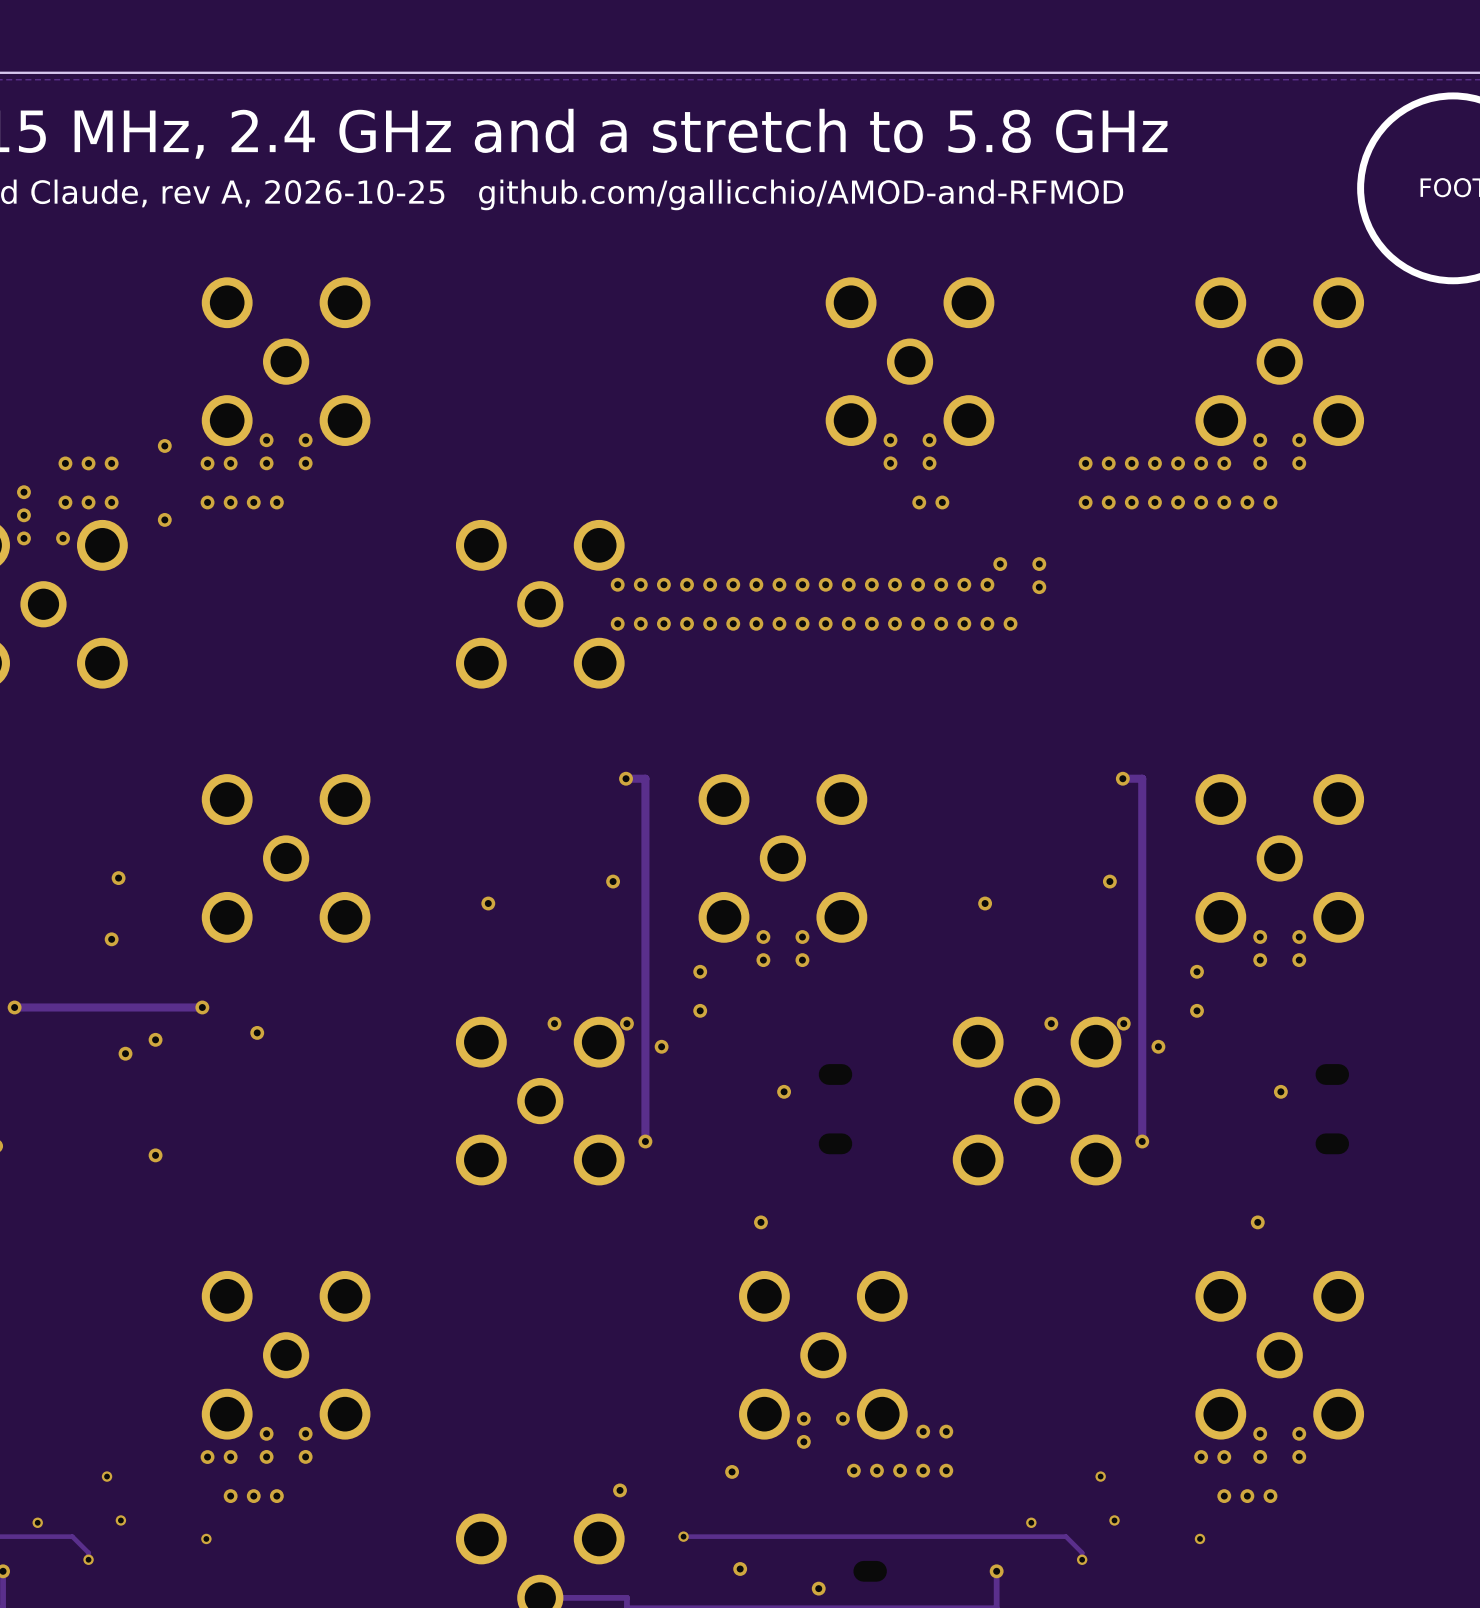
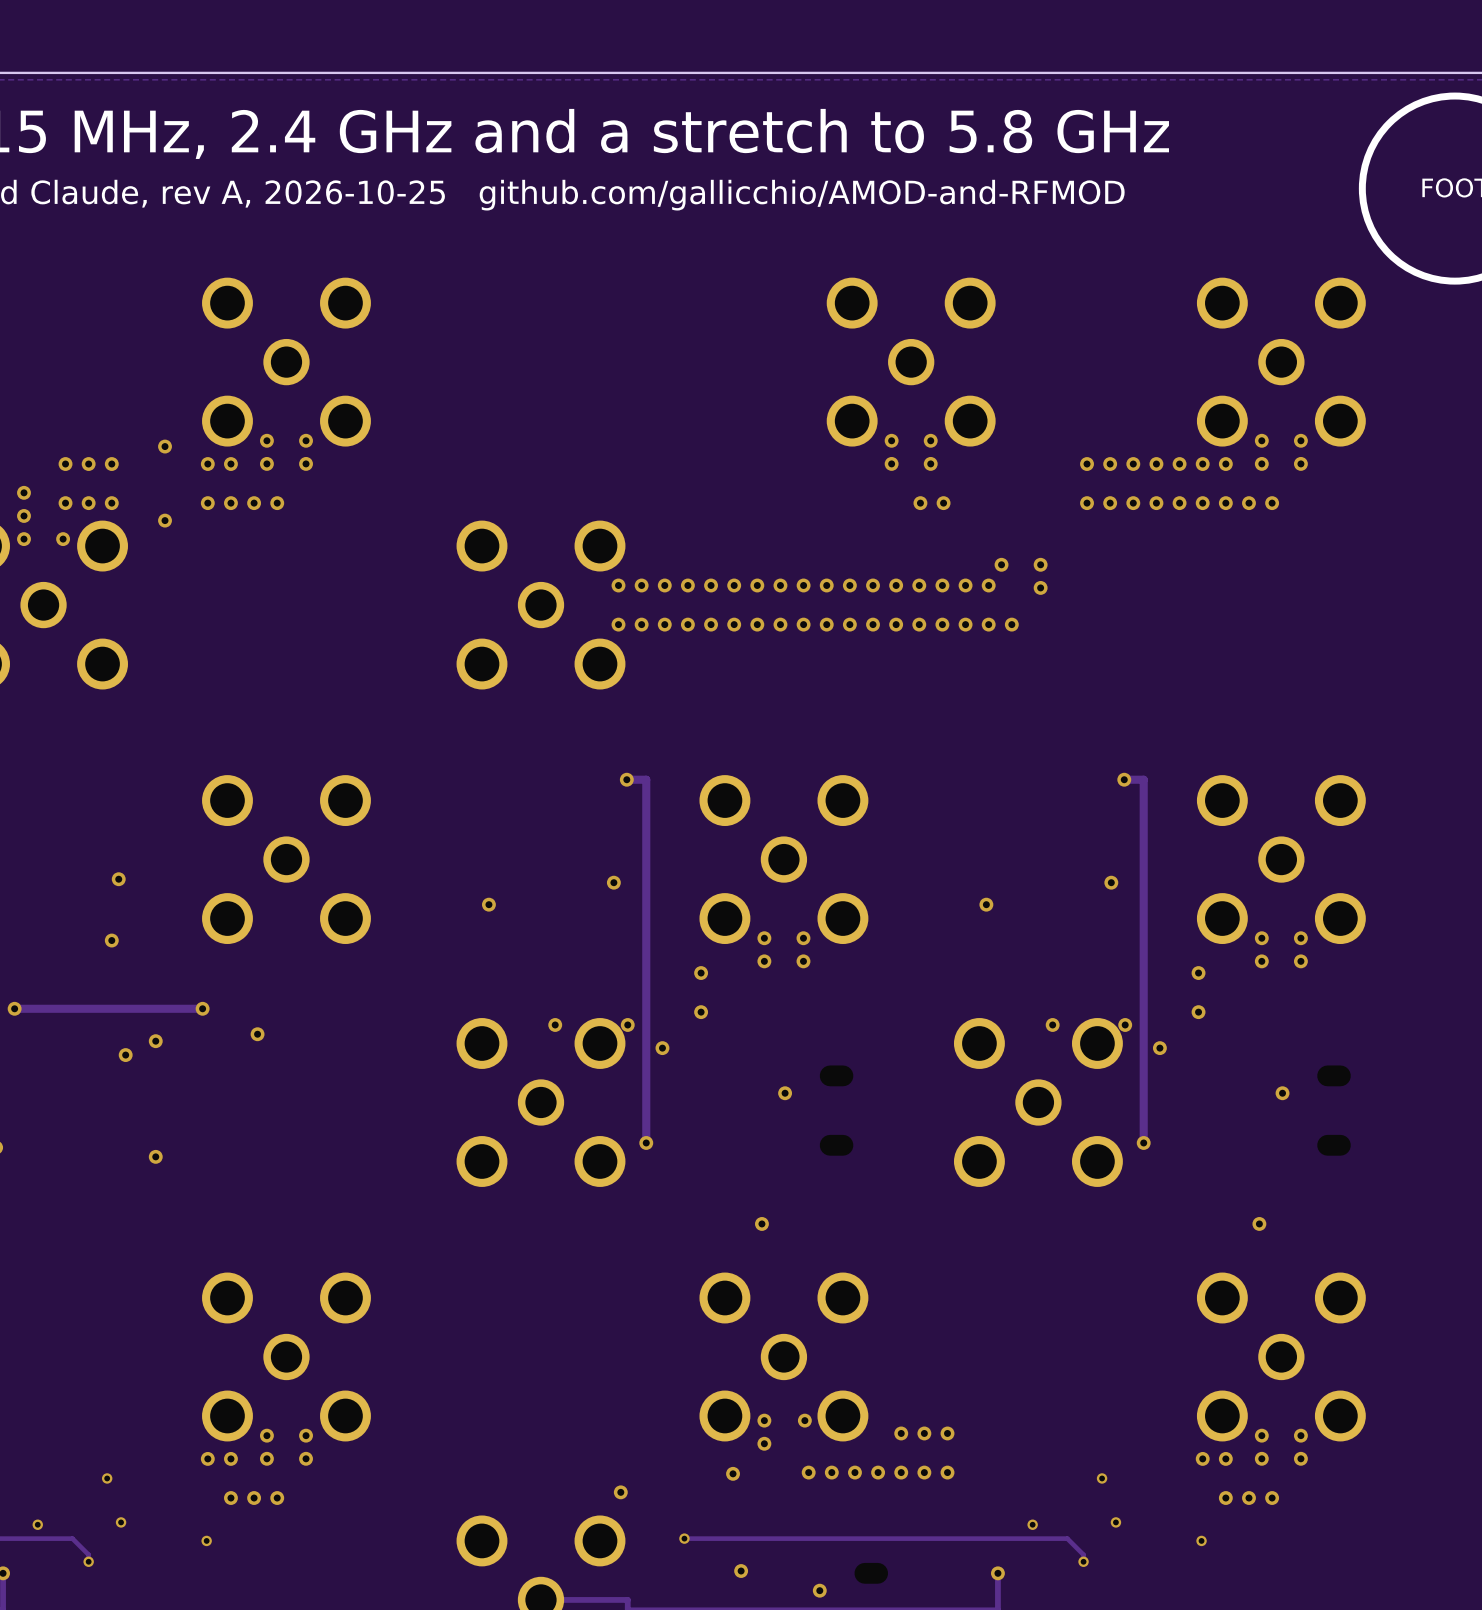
part position: (823, 1355) -> (783, 1356)
via: none -> (764, 1420)
via: (842, 1418) -> none
via: none -> (901, 1433)
via: none -> (764, 1443)
via: (803, 1441) -> none
via: none -> (808, 1472)
via: none -> (831, 1472)

